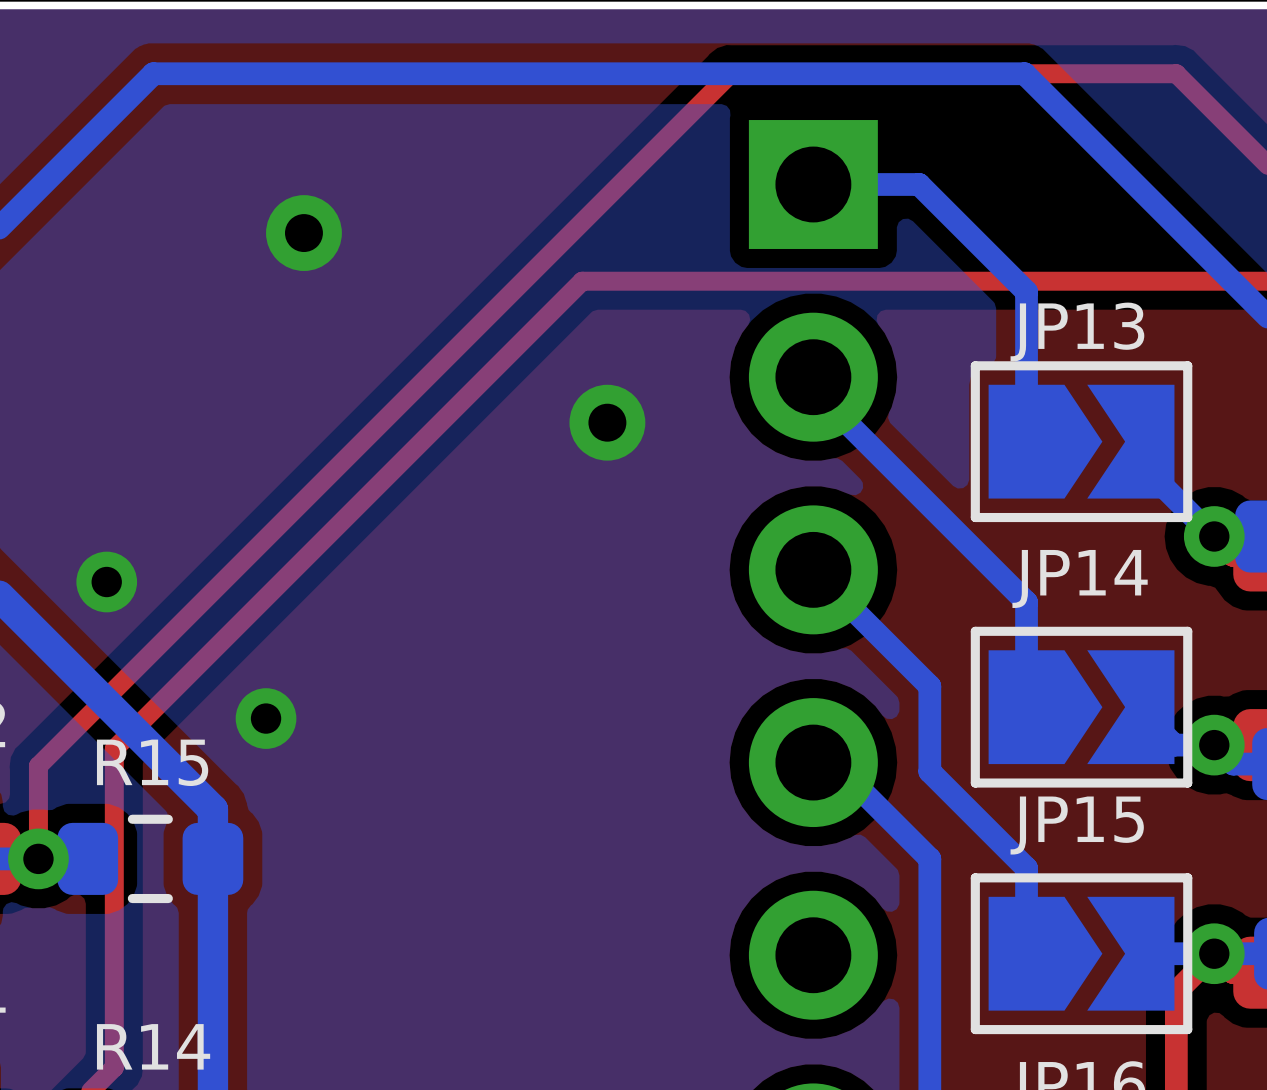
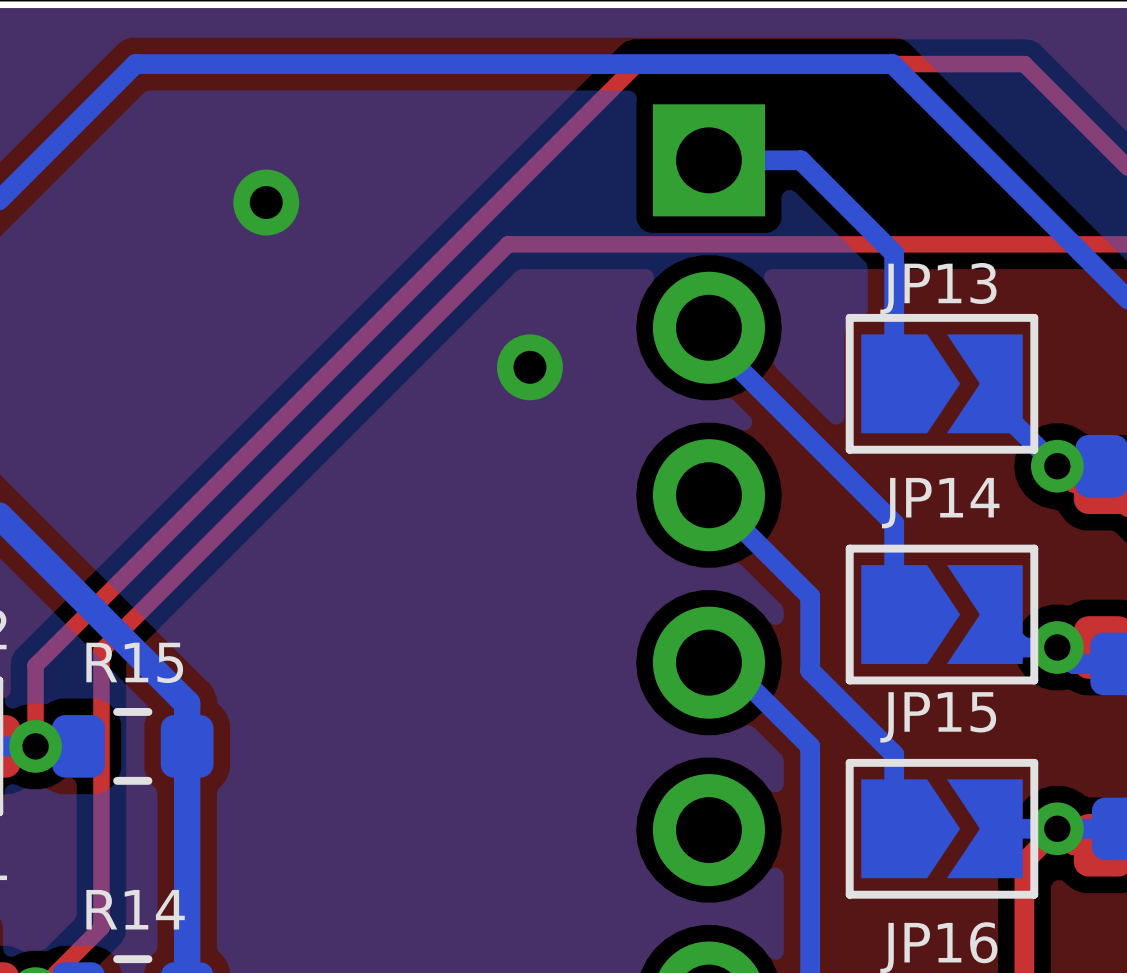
via: (106, 582) -> none
via: (266, 718) -> none

